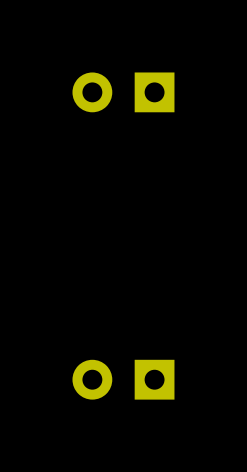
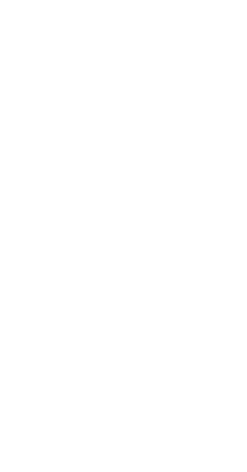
part: (123, 92) -> none
part: (123, 379) -> none

